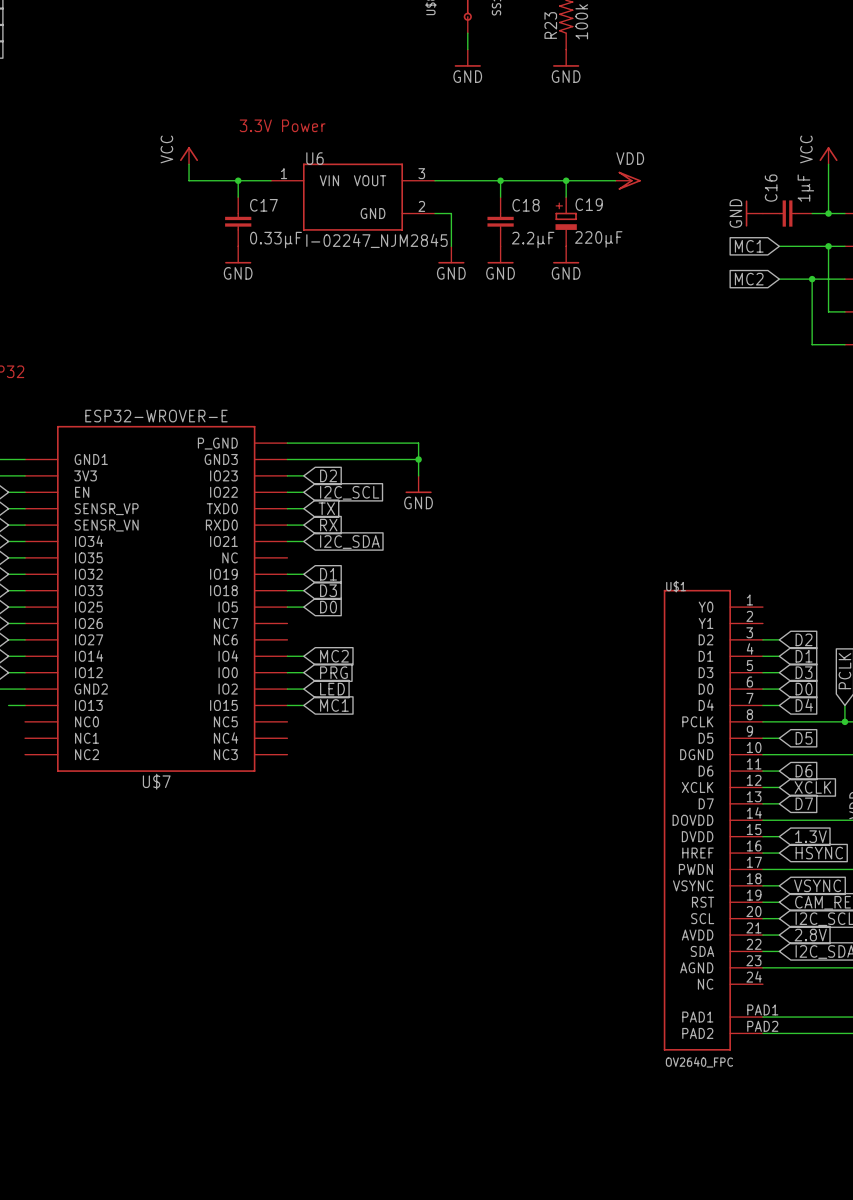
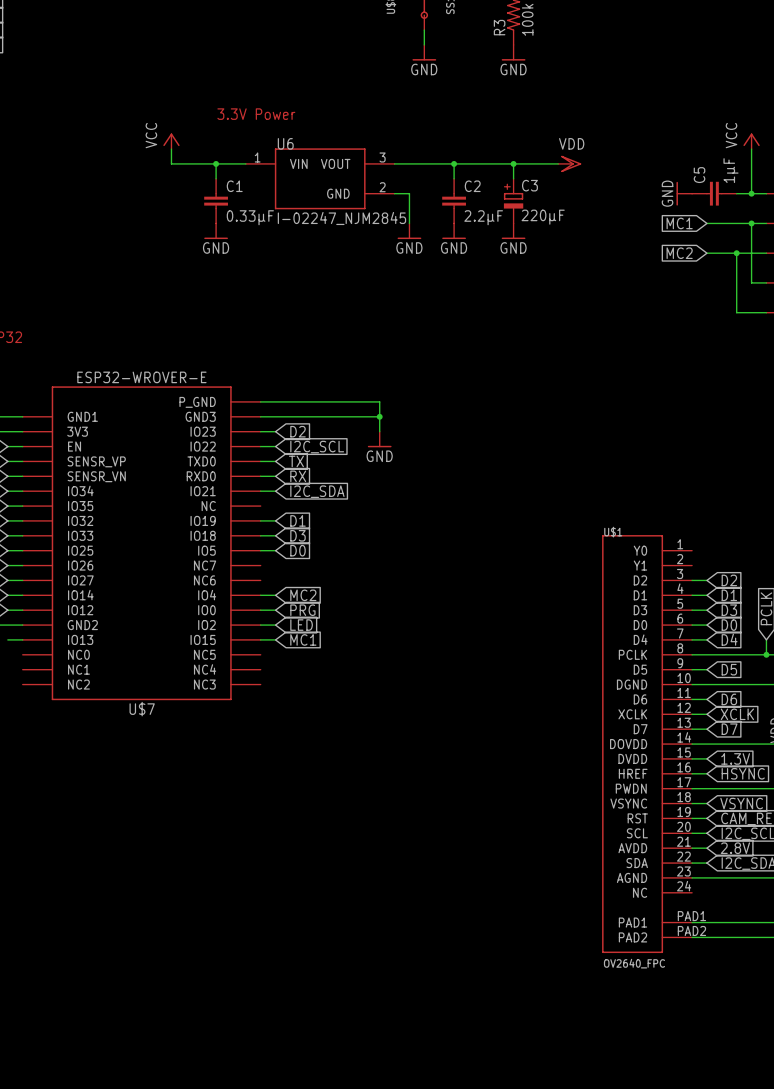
R23 name: R23 (550, 25) -> R3 (499, 27)
C16 name: C16 (771, 188) -> C5 (699, 175)
C19 name: C19 (589, 204) -> C3 (529, 185)
C17 name: C17 (263, 205) -> C1 (234, 186)
C18 name: C18 (526, 205) -> C2 (472, 186)

